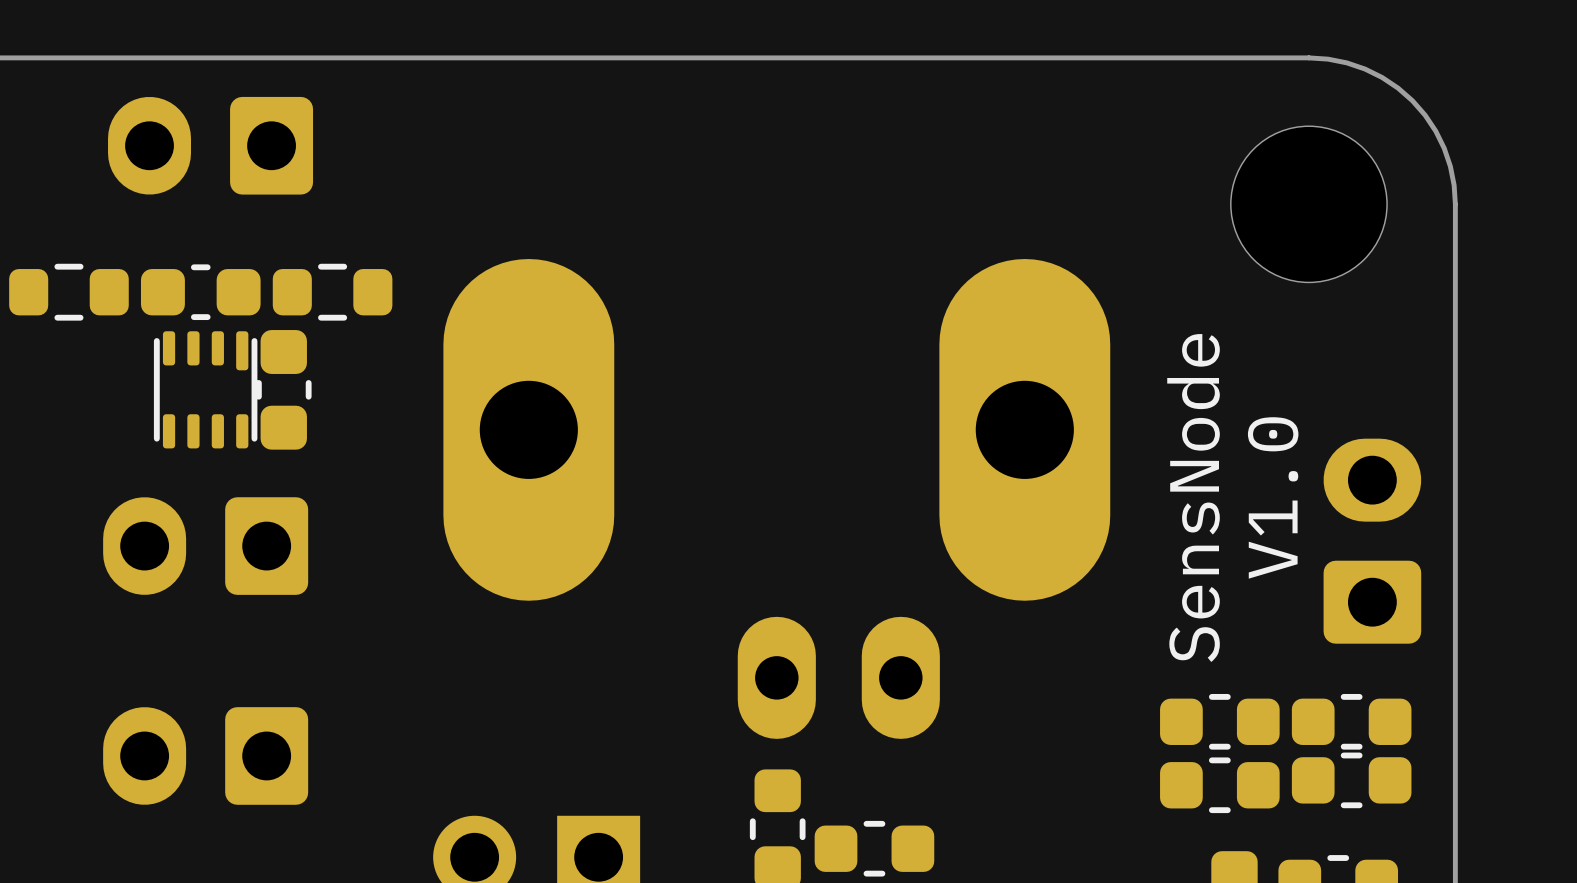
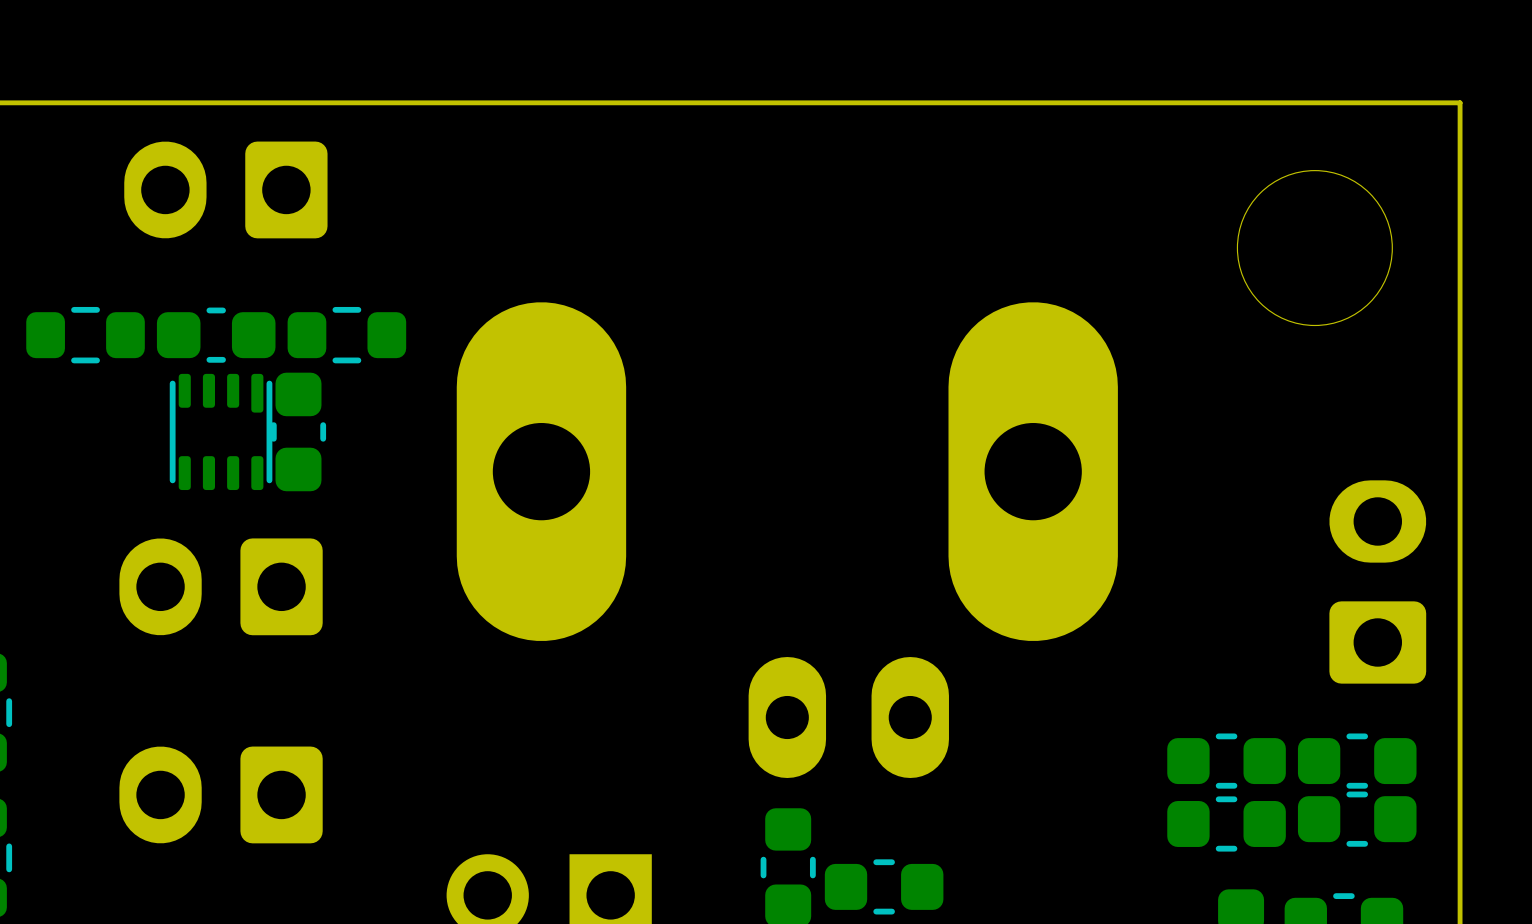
board edge: (1308, 57) (1346, 62) (1364, 69) (1382, 77) (1412, 100) (1435, 131) (1444, 148) (1450, 166) (1455, 204) -> (1314, 102) (1460, 102) (1460, 248)
text: V1.0 (1273, 497) -> none
text: SensNode (1193, 498) -> none

